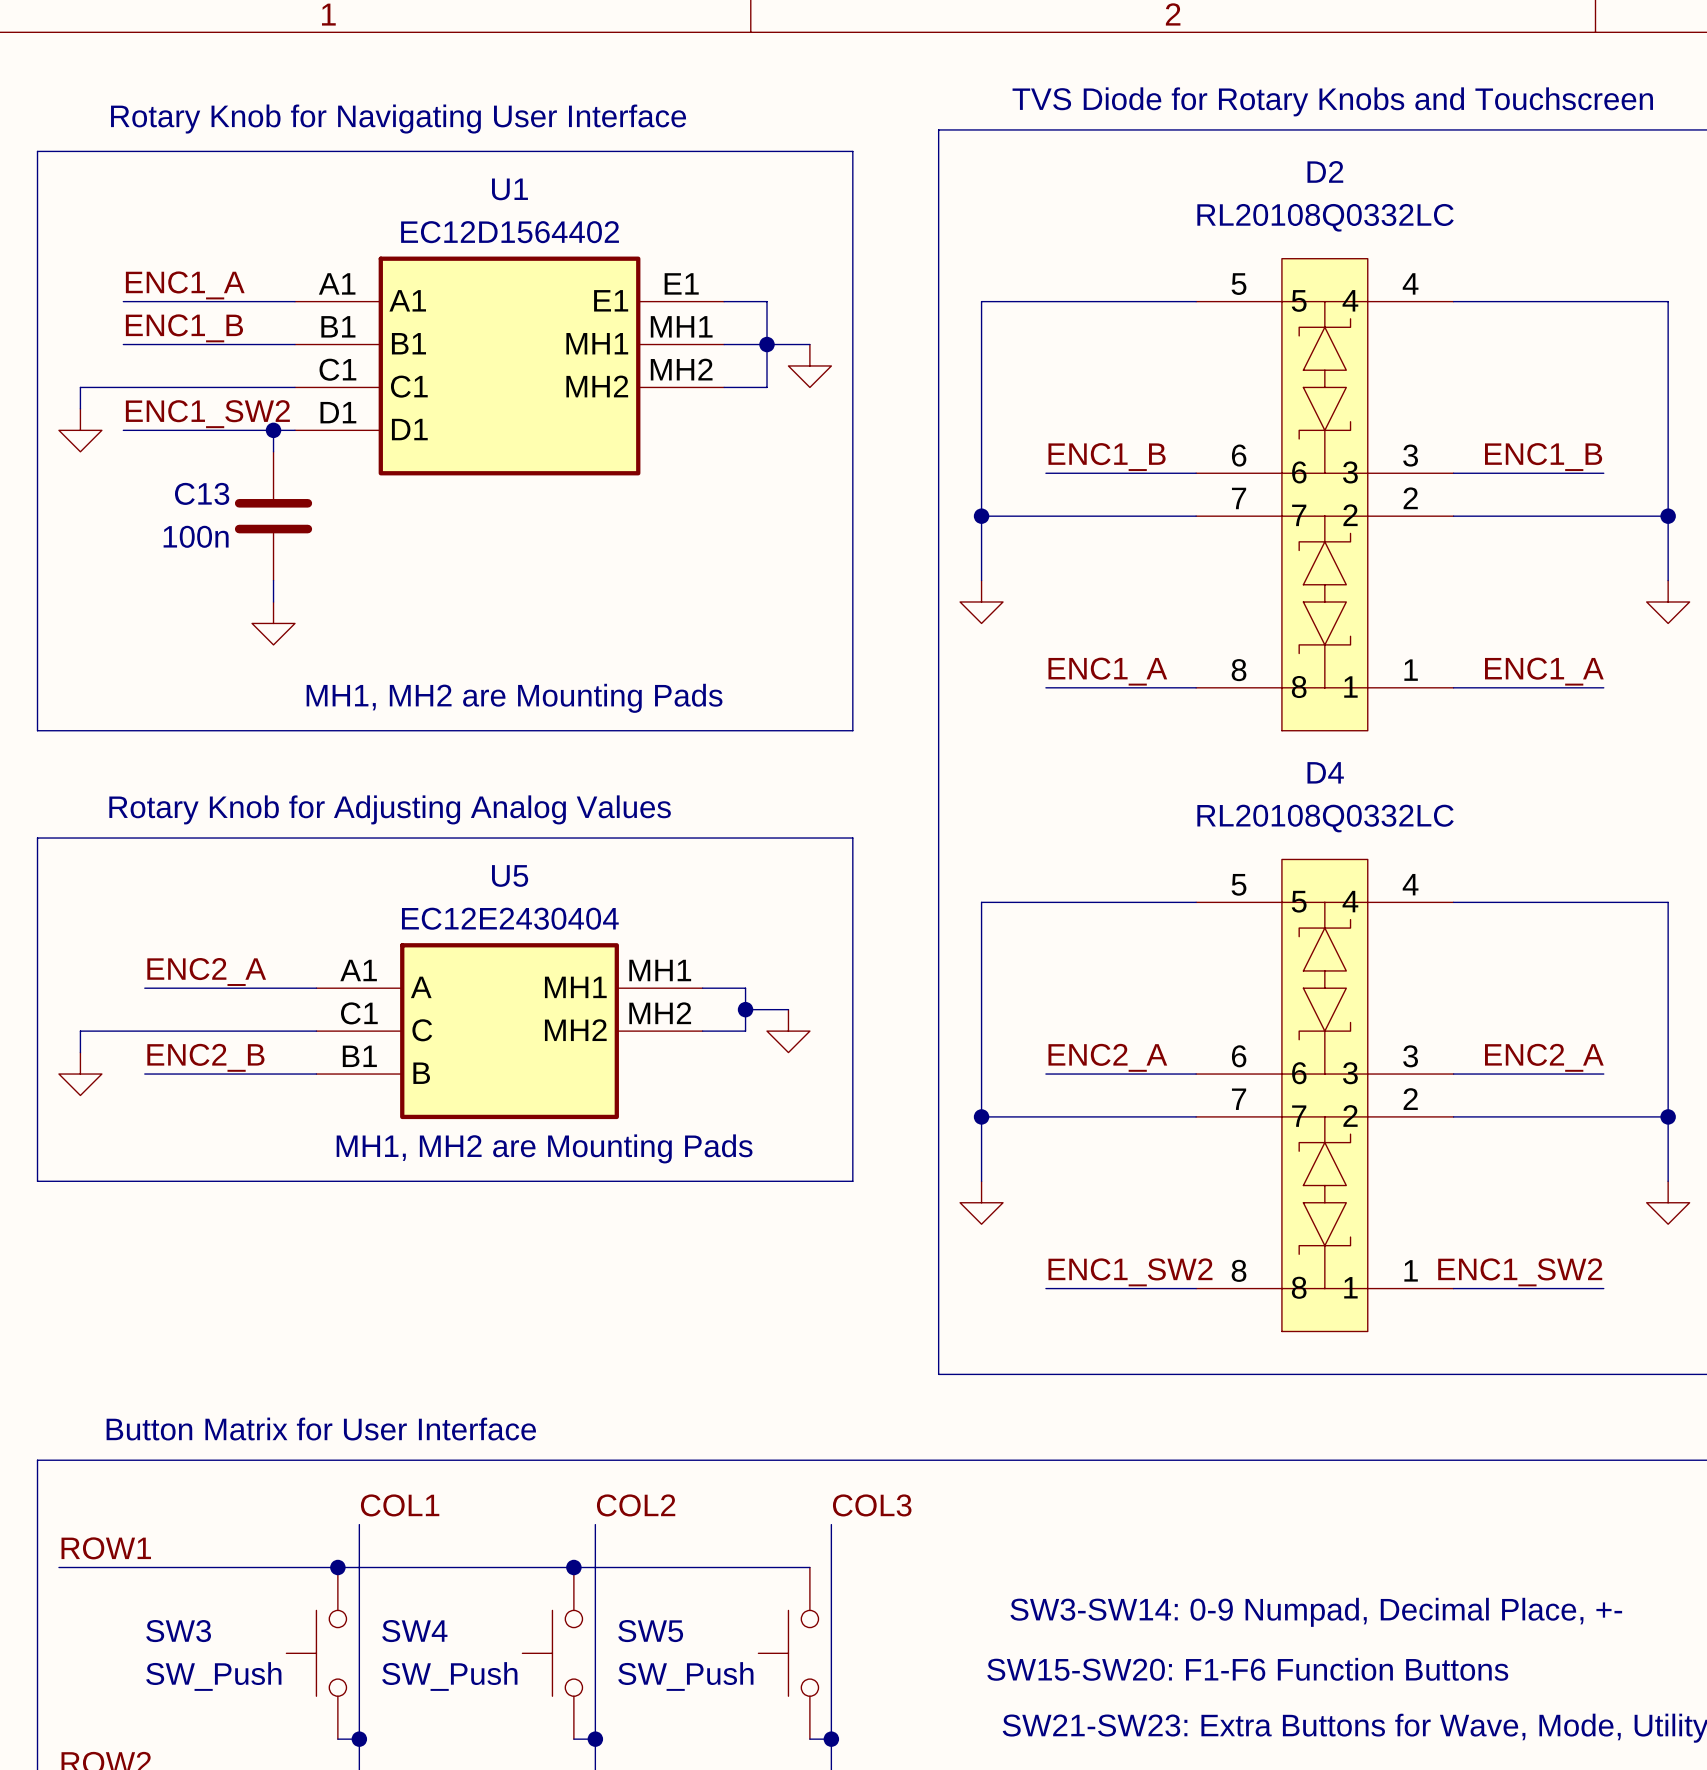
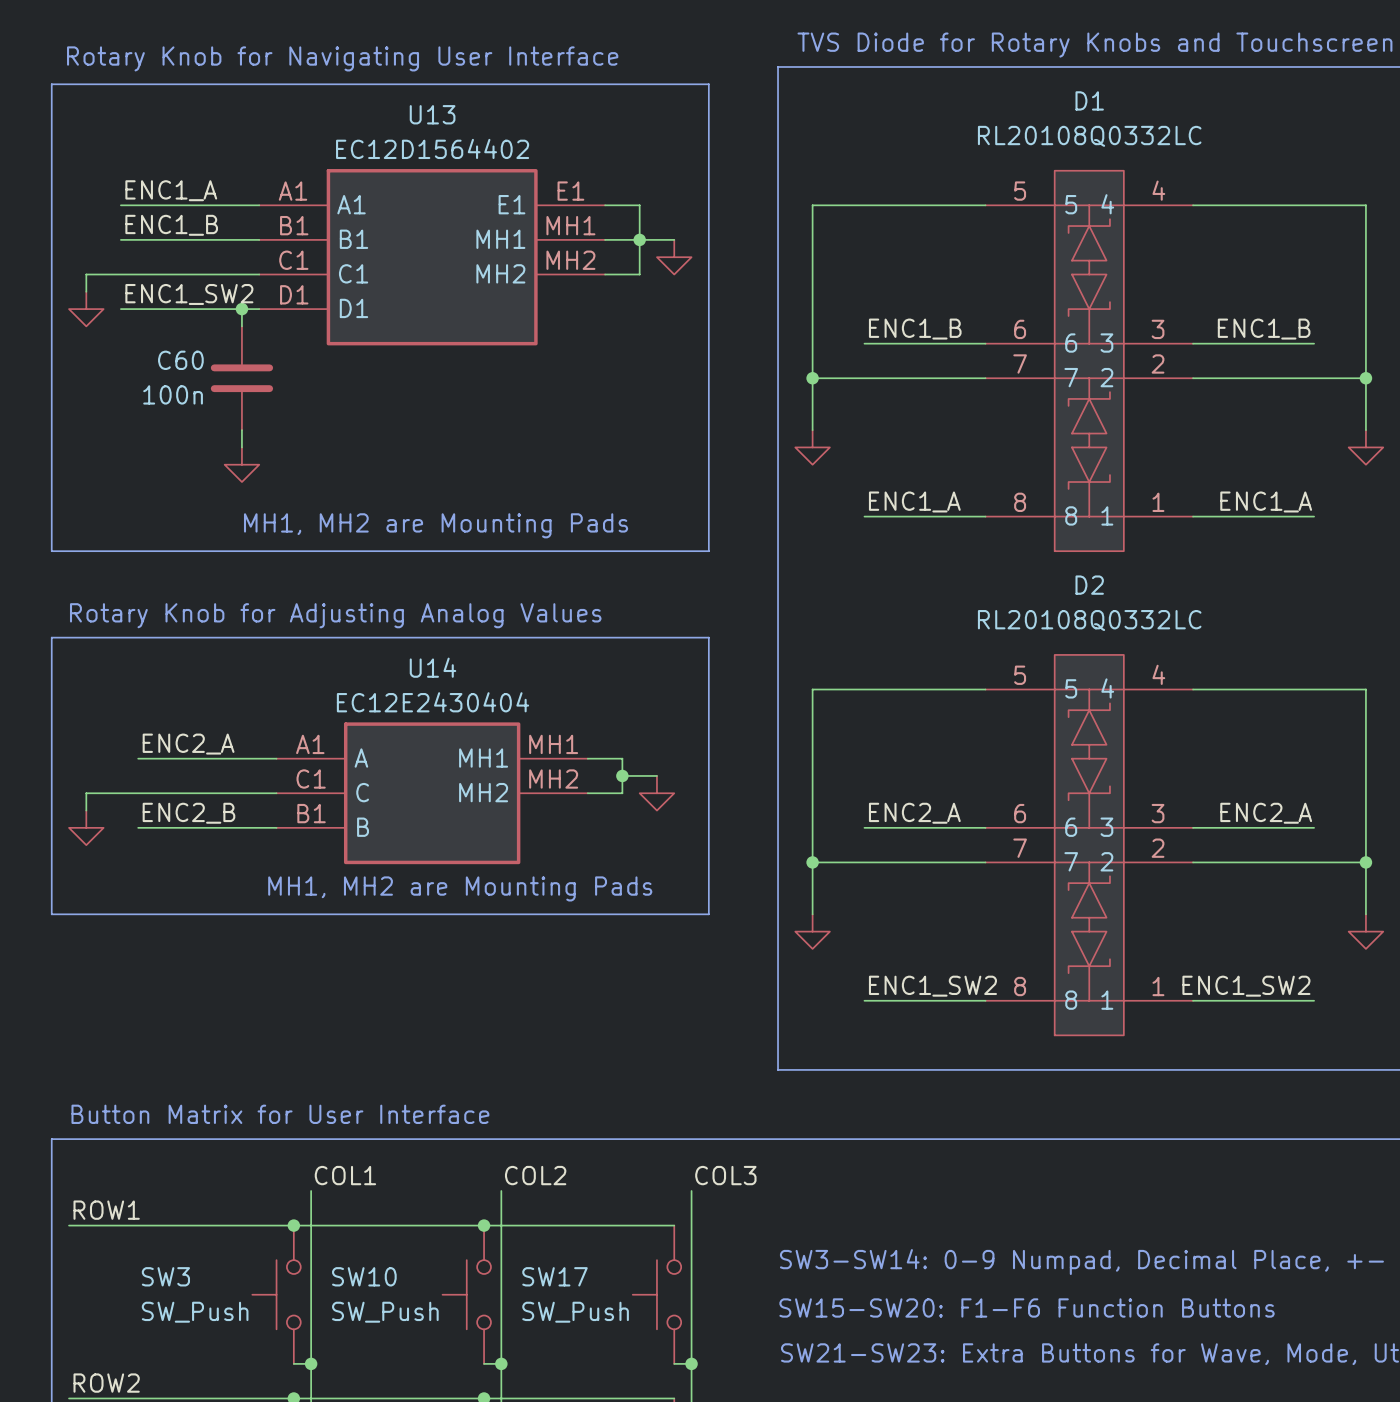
D2 name: D2 (1325, 171) -> D1 (1089, 100)
U1 name: U1 (509, 189) -> U13 (432, 114)
C13 name: C13 (202, 493) -> C60 (180, 360)
D4 name: D4 (1325, 772) -> D2 (1089, 585)
U5 name: U5 (510, 875) -> U14 (432, 667)
SW4 name: SW4 (414, 1631) -> SW10 (364, 1276)
SW5 name: SW5 (650, 1631) -> SW17 (554, 1276)

